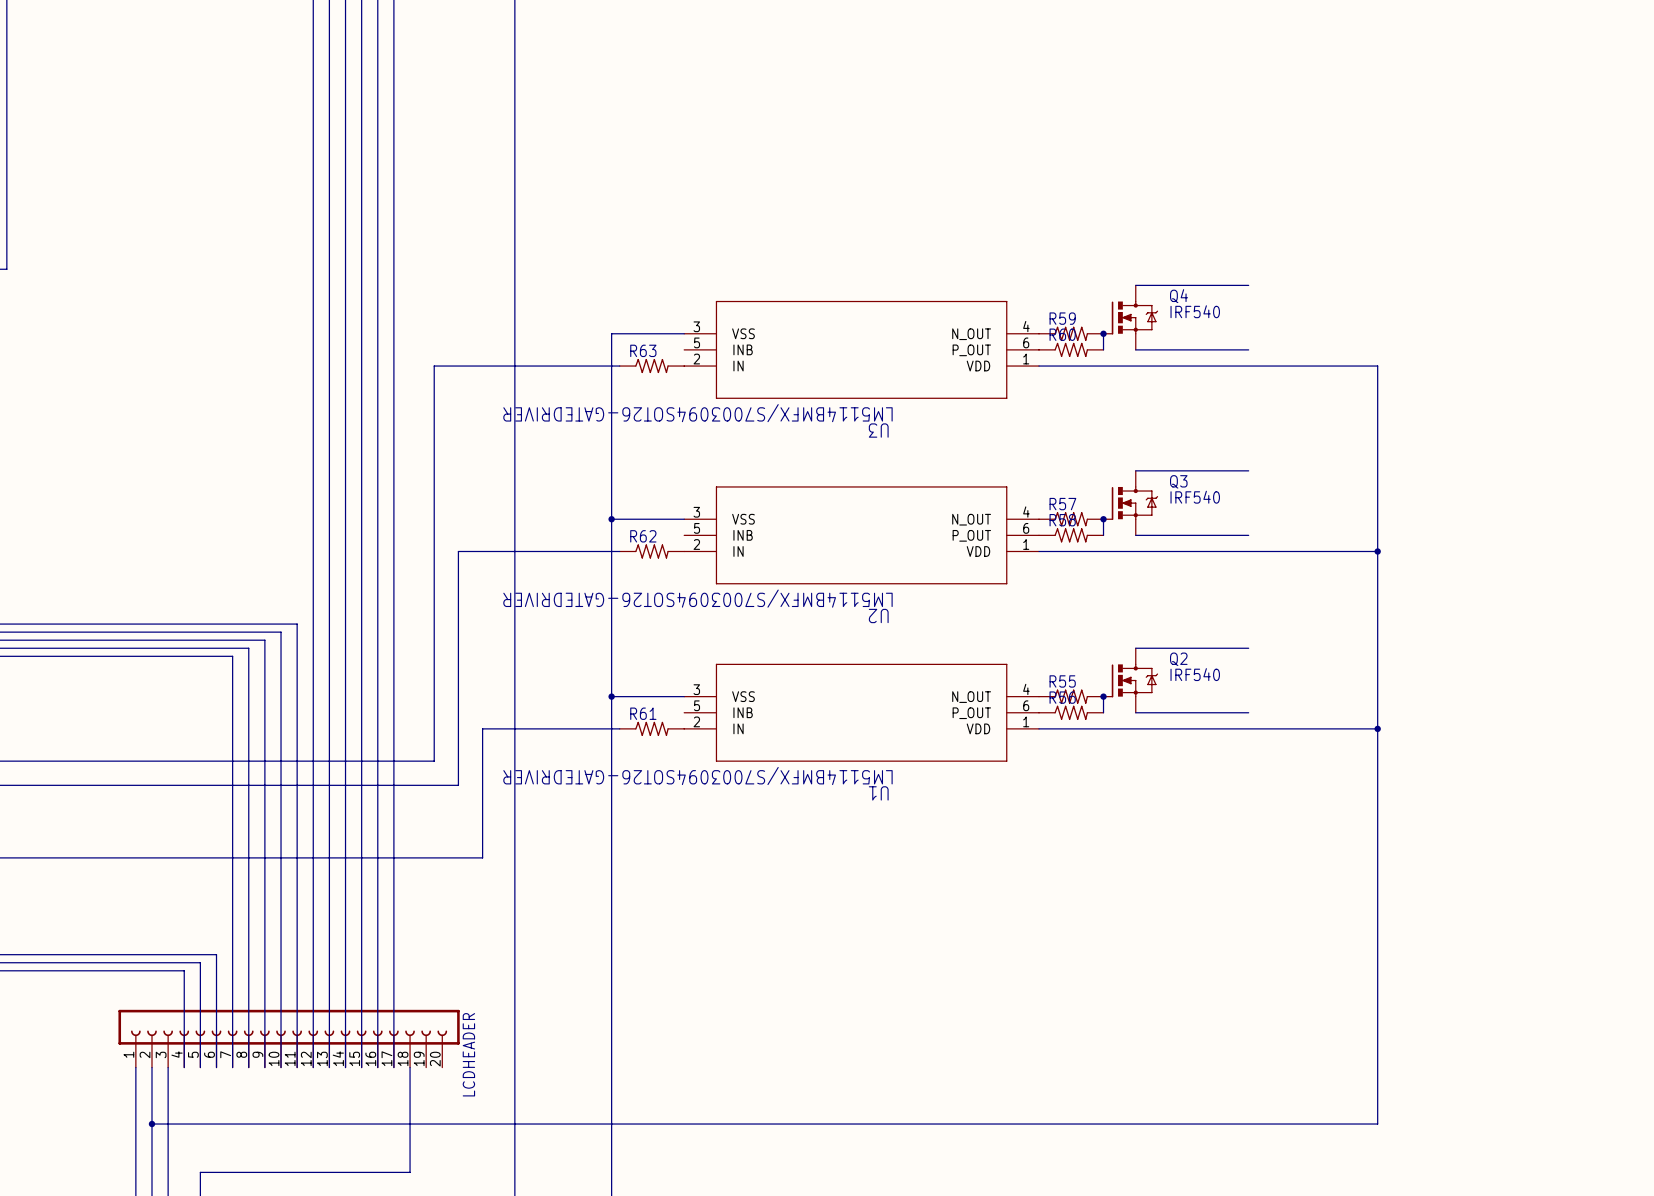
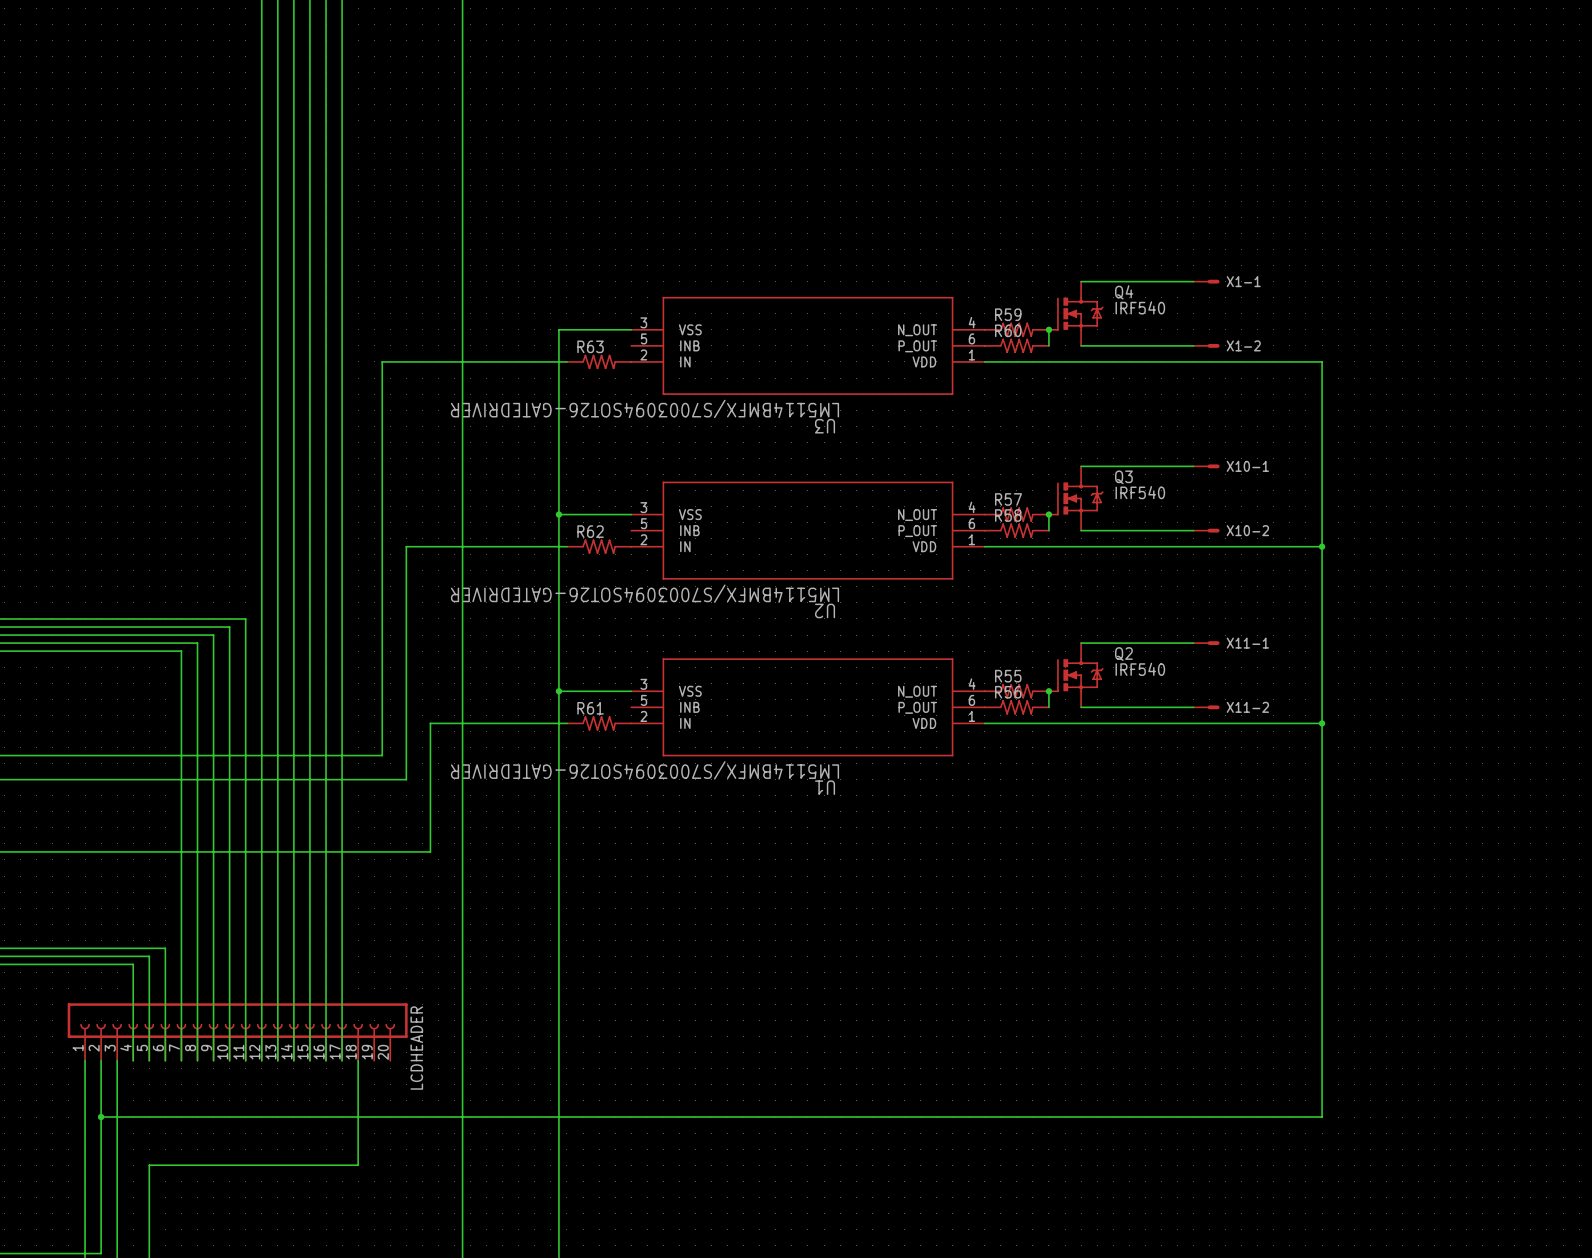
X1-1: none -> (1206, 281)
X1-2: none -> (1206, 345)
X10-1: none -> (1206, 466)
X10-2: none -> (1206, 530)
X11-1: none -> (1206, 643)
X11-2: none -> (1206, 707)

